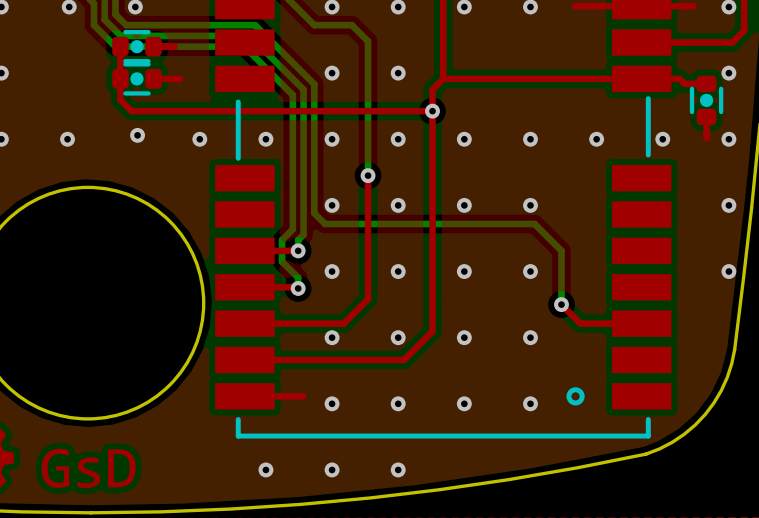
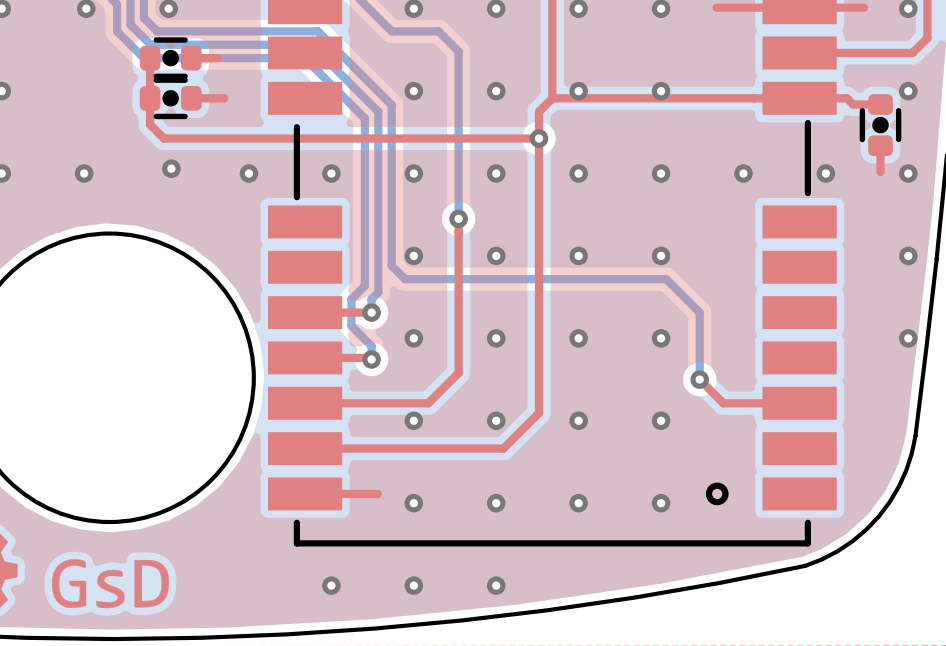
via: none -> (578, 91)
via: none -> (661, 91)

